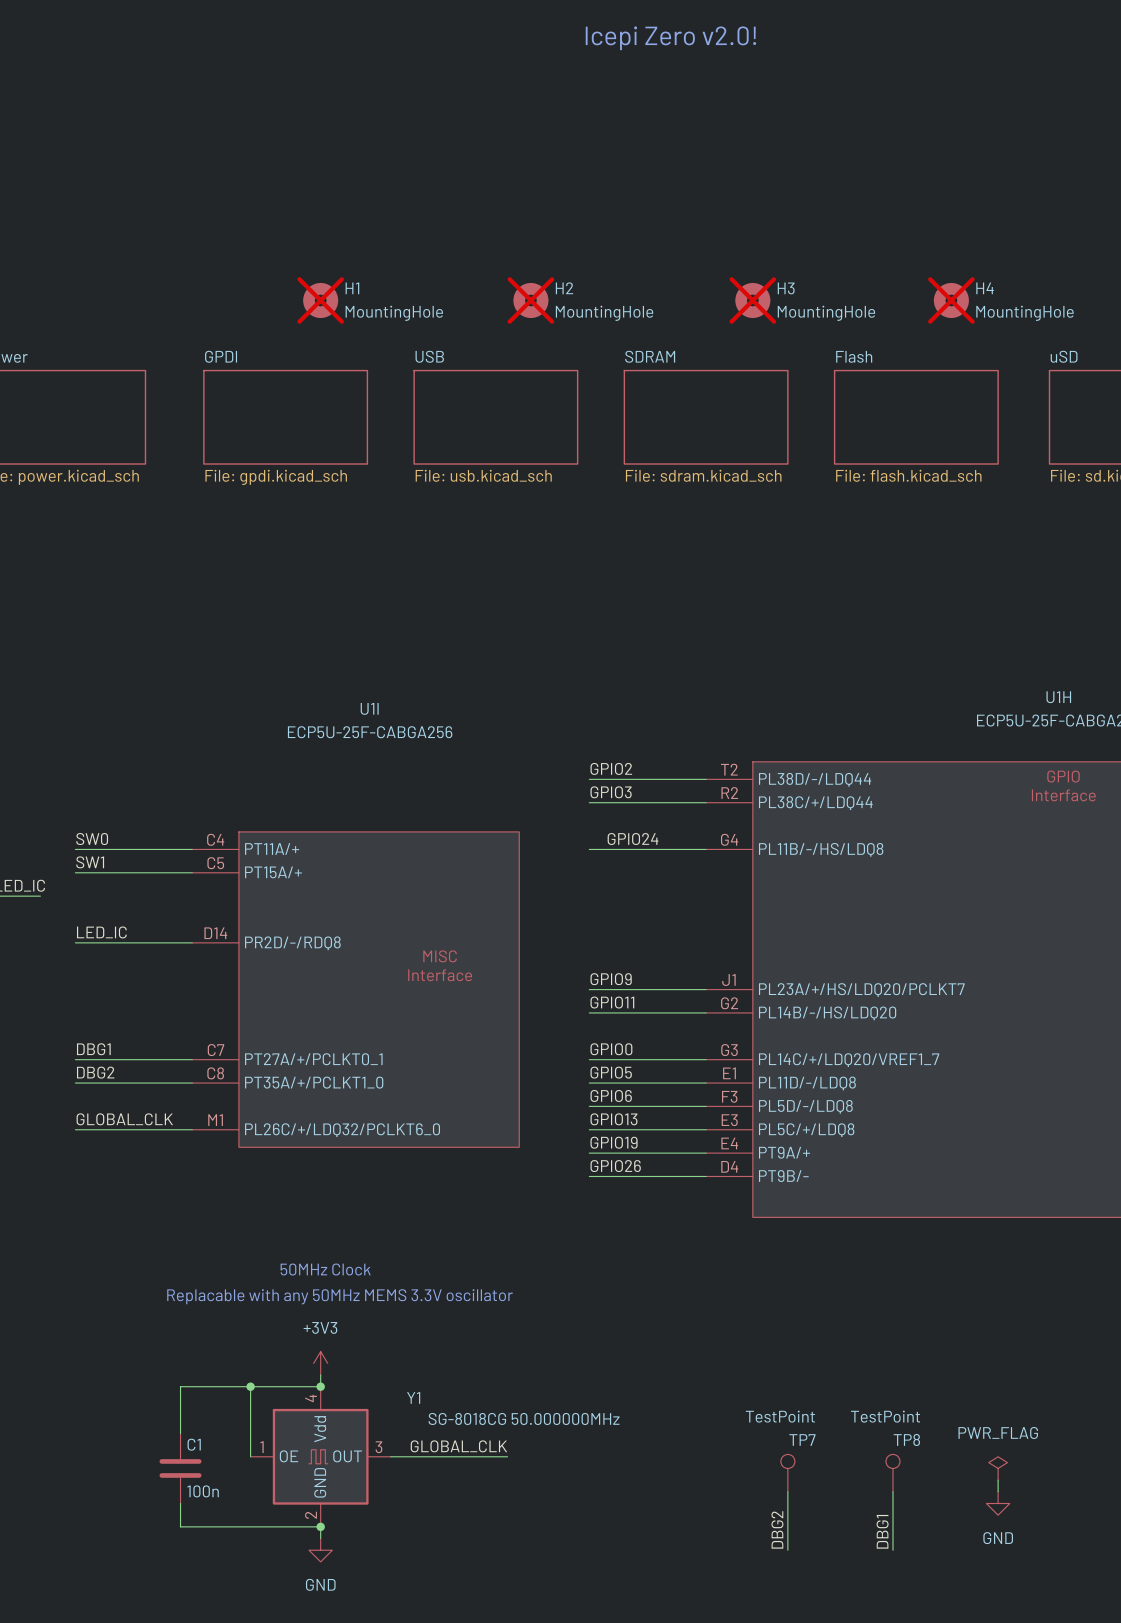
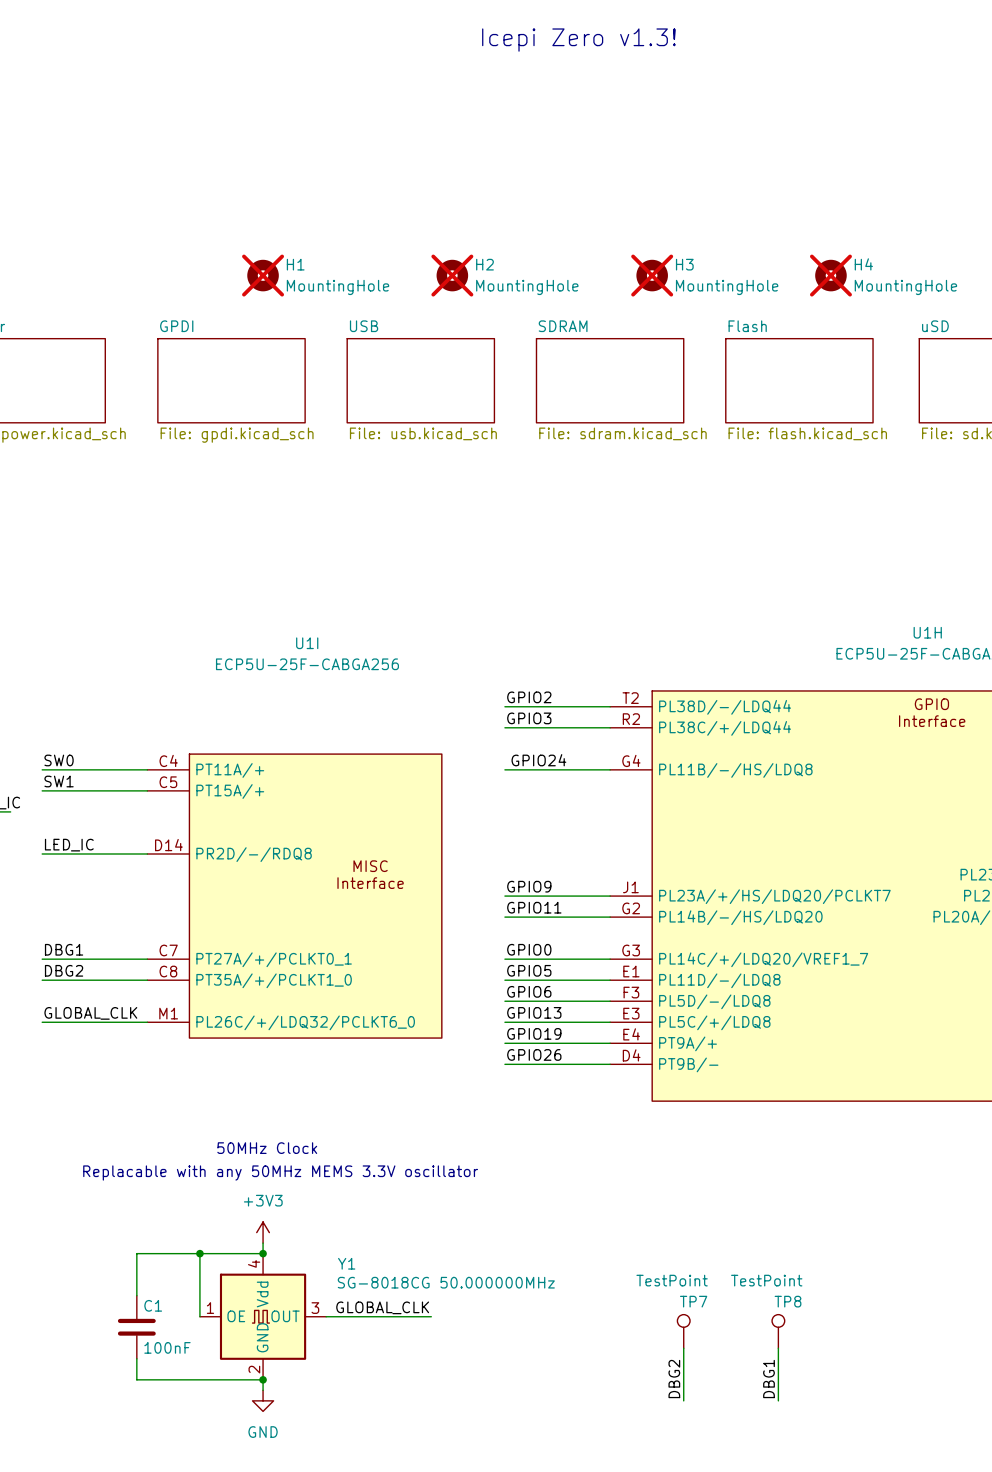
text: Icepi Zero v2.0! (670, 38) -> Icepi Zero v1.3! (578, 40)
power symbol: PWR_FLAG (998, 1468) -> none
wire: (998, 1480) (998, 1491) -> none
C1 value: 100n (203, 1491) -> 100nF (167, 1347)
power symbol: GND (998, 1503) -> none

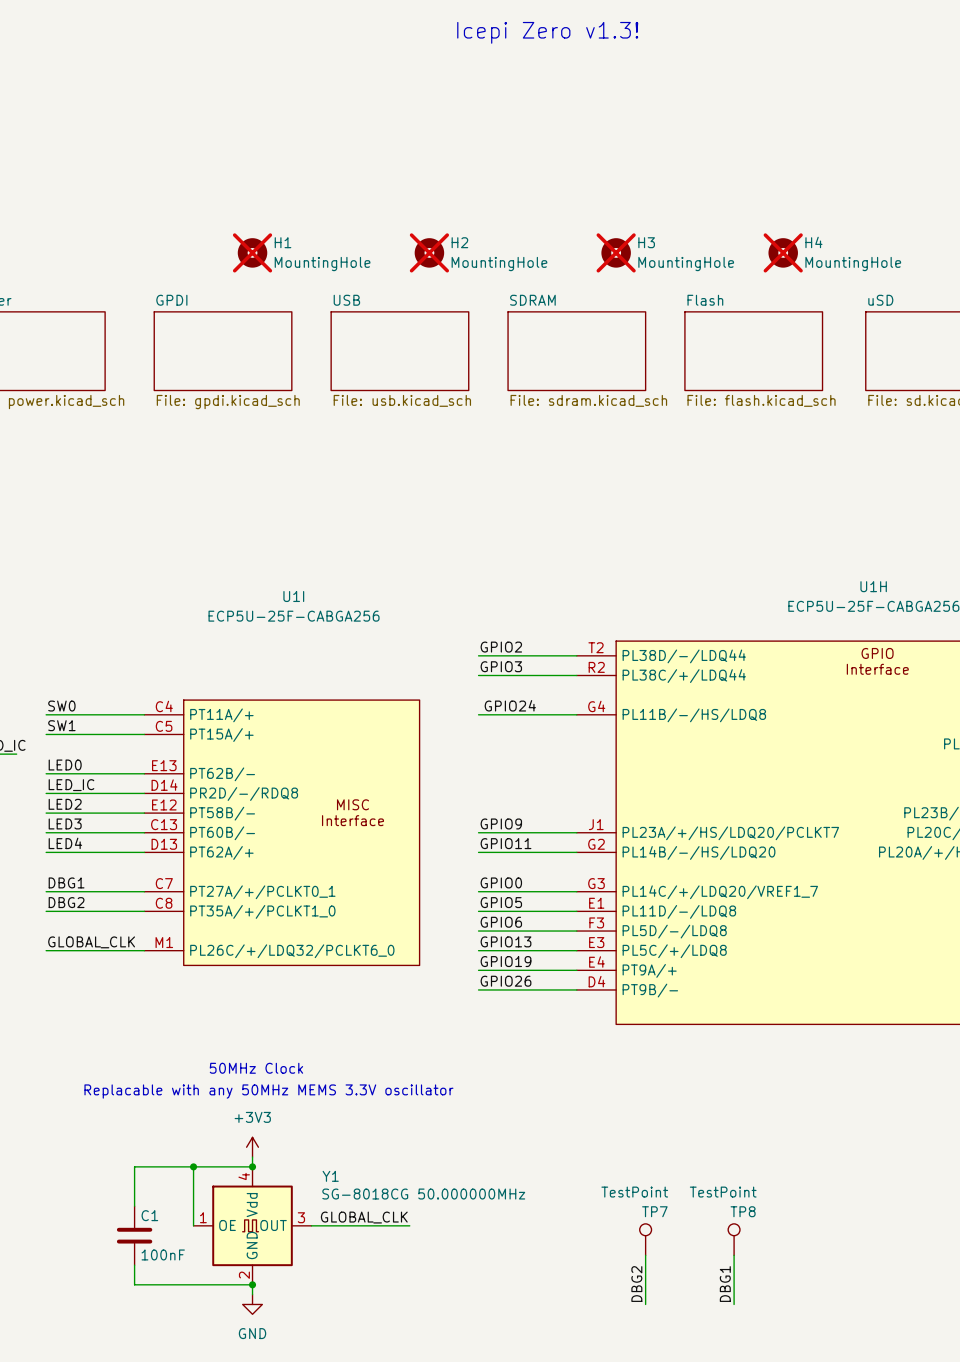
U1I symbol: [147, 754, 442, 1039] -> [144, 700, 420, 966]
label: none -> LED0 (65, 765)
wire: none -> (46, 773) (144, 773)
label: none -> LED2 (65, 804)
wire: none -> (46, 813) (144, 813)
label: none -> LED3 (65, 823)
wire: none -> (46, 832) (144, 832)
label: none -> LED4 (65, 843)
wire: none -> (46, 852) (144, 852)

